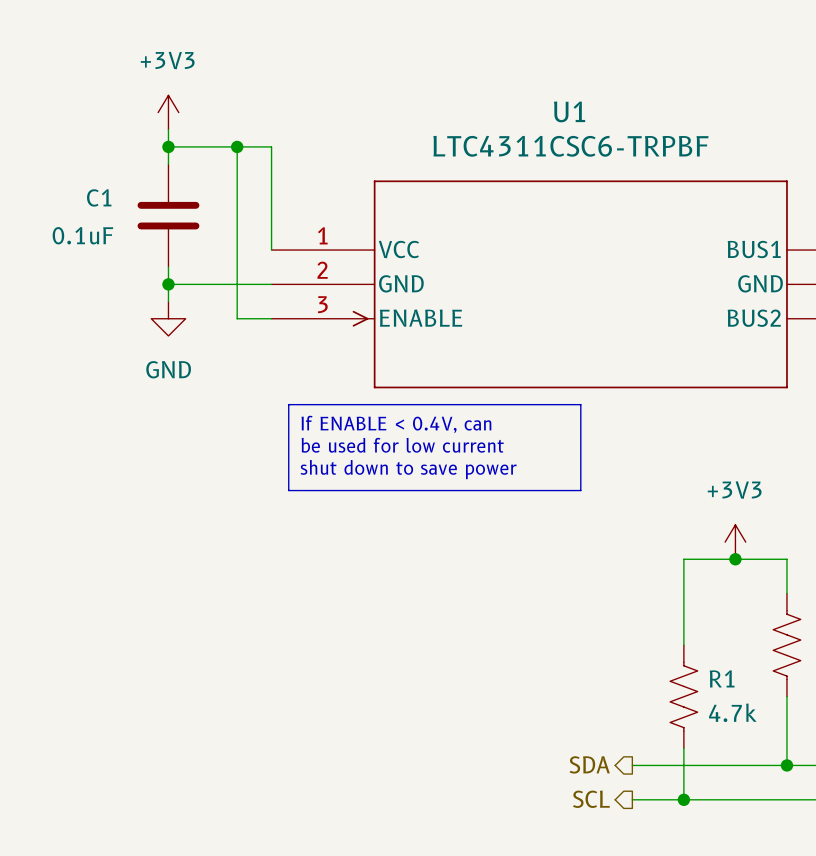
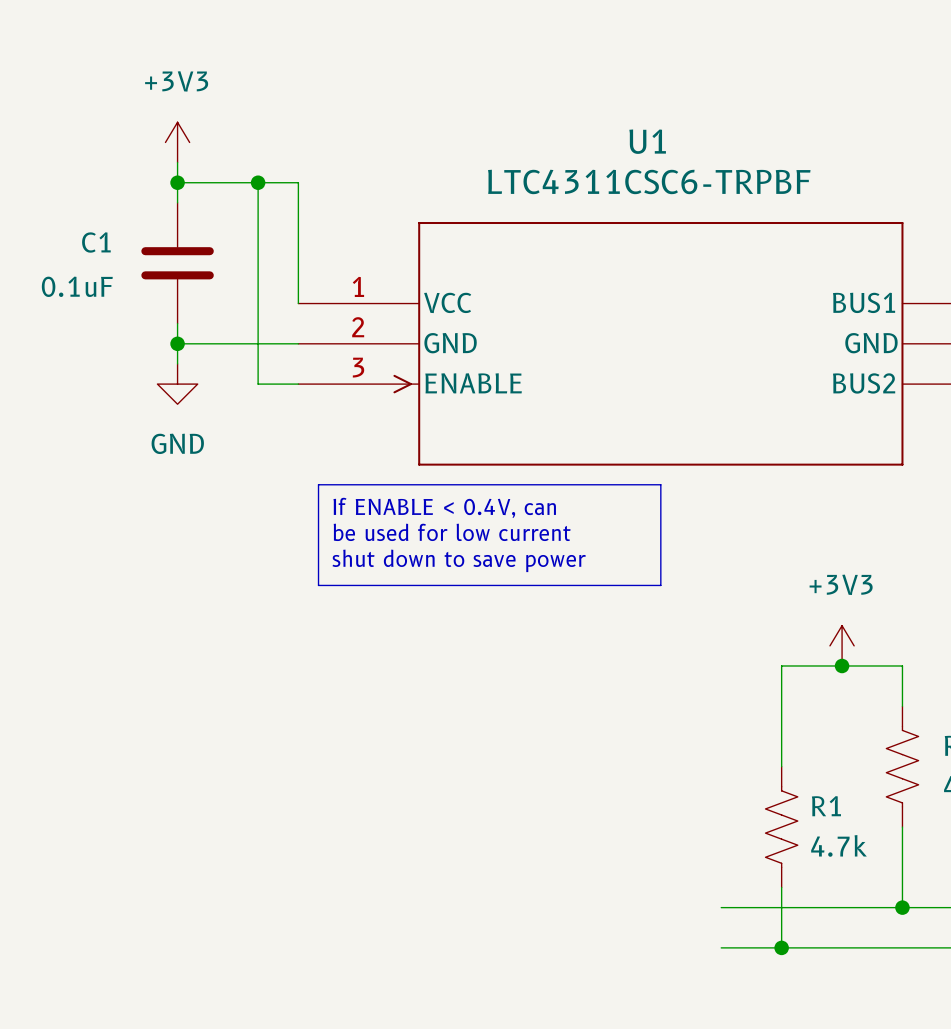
hierarchical label: SDA (589, 764) -> none
hierarchical label: SCL (591, 799) -> none

